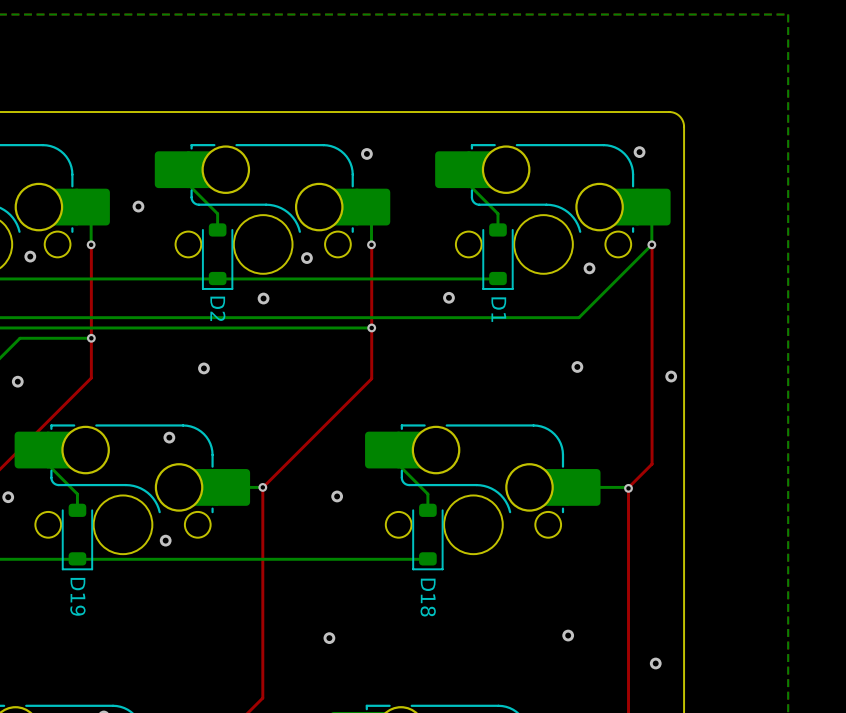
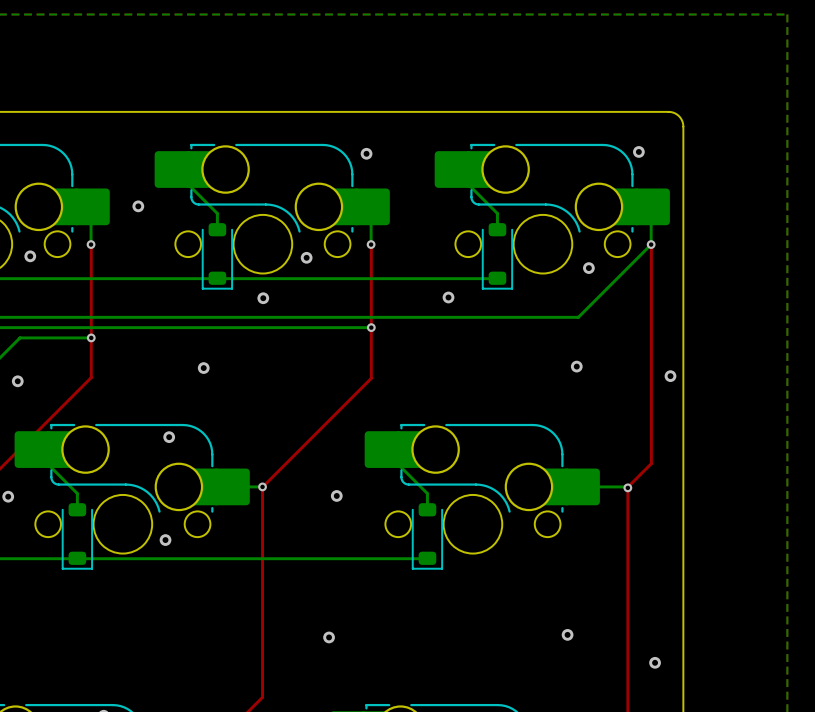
D2 name: D2 (217, 308) -> none
D1 name: D1 (498, 309) -> none
D19 name: D19 (77, 596) -> none
D18 name: D18 (428, 597) -> none

